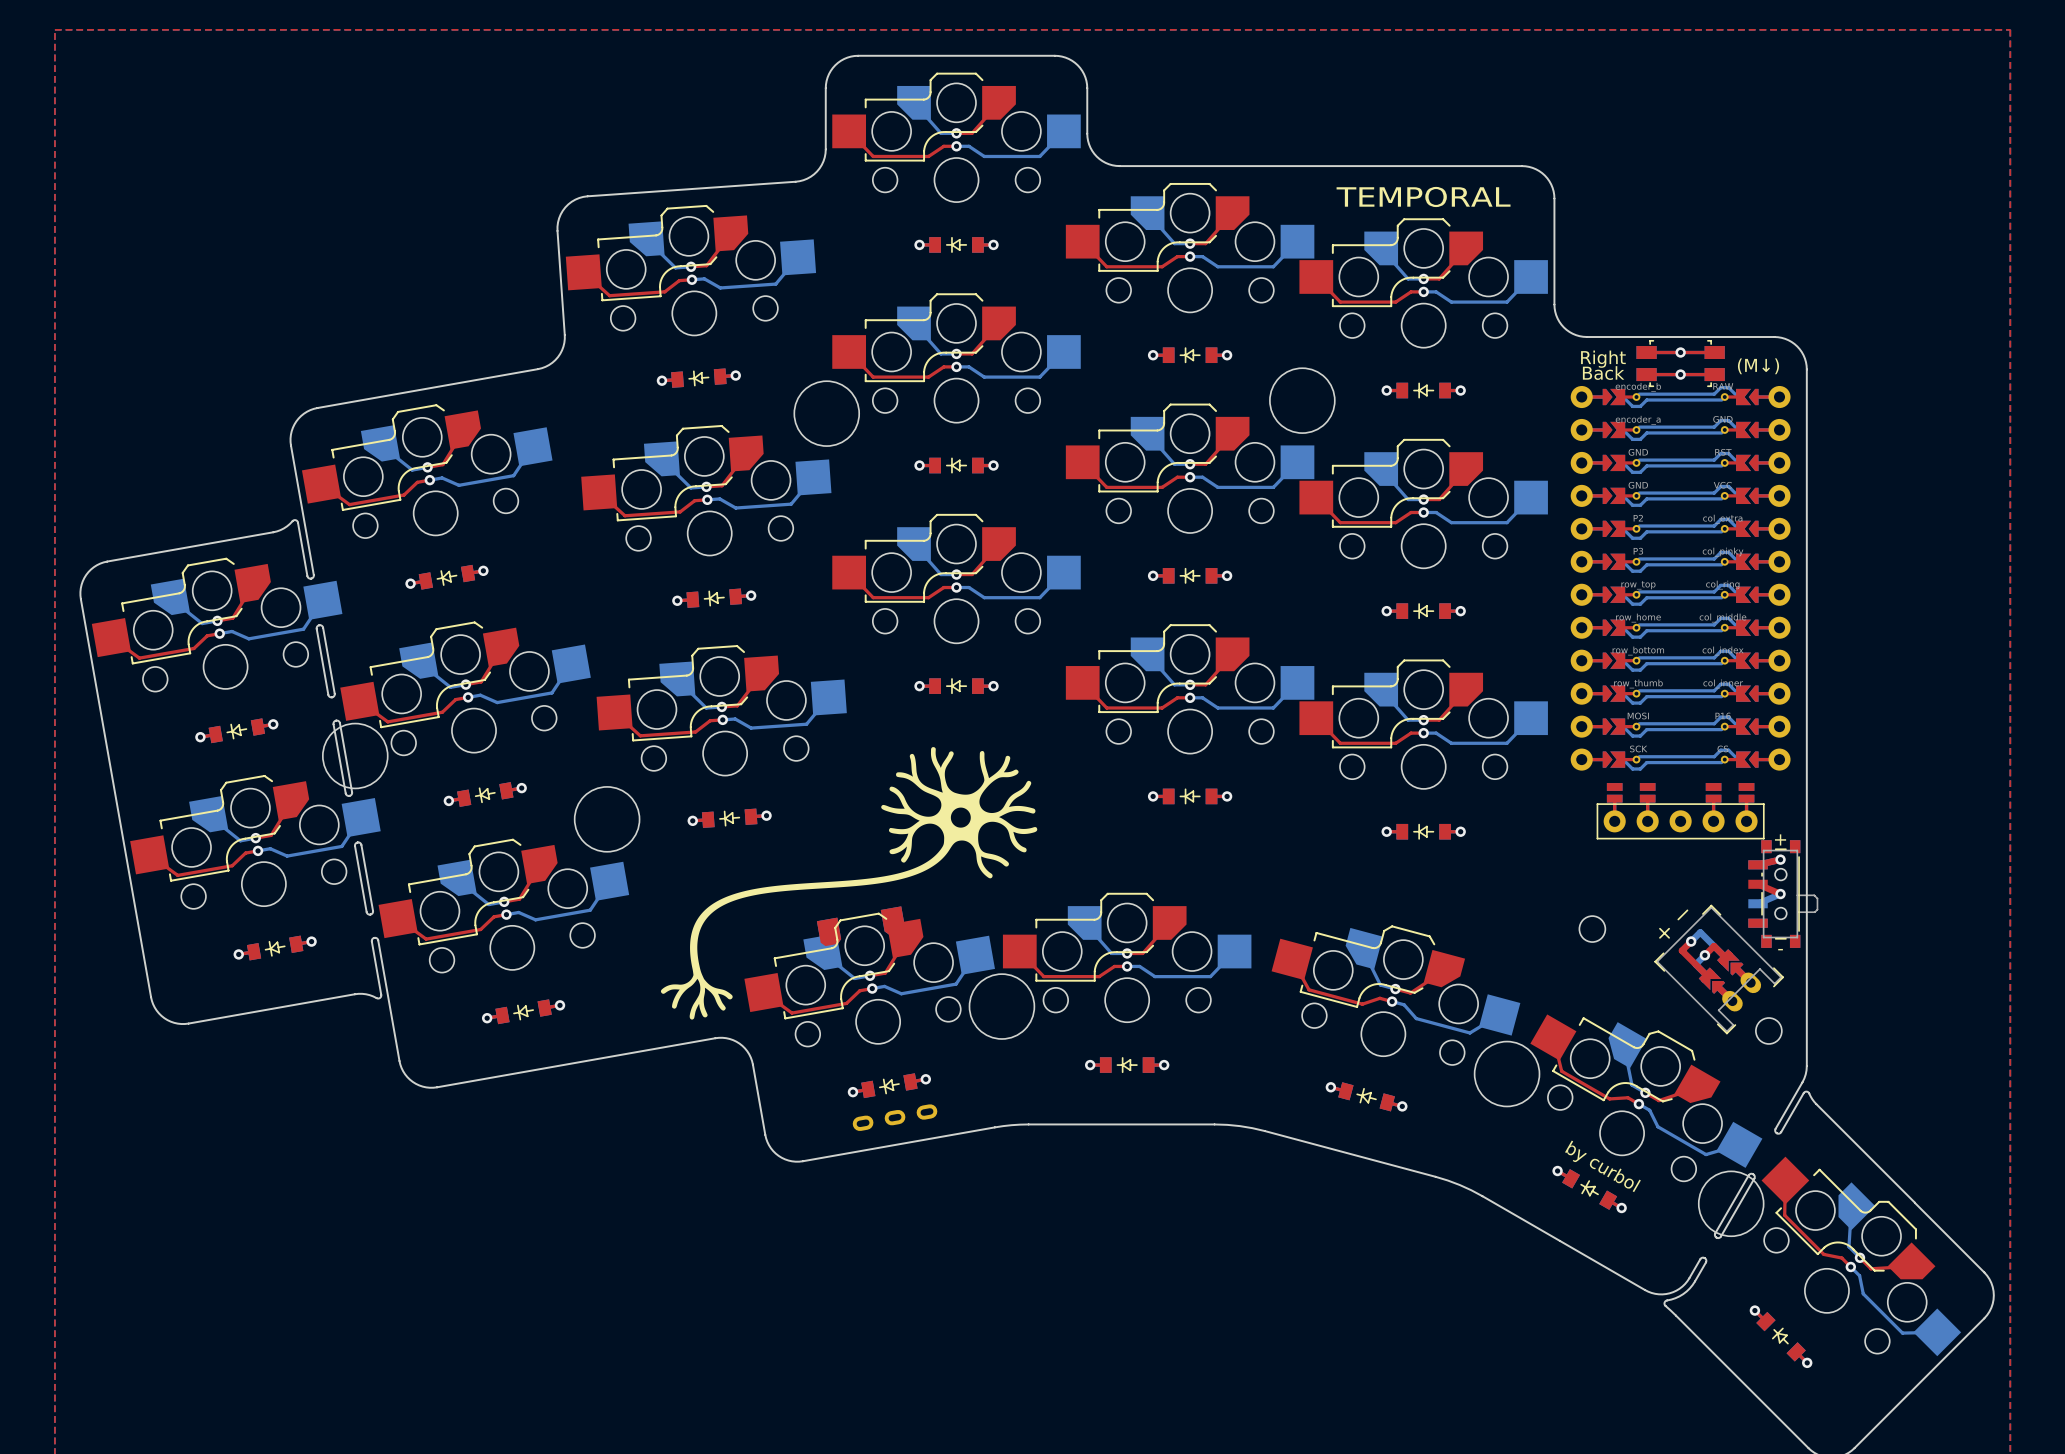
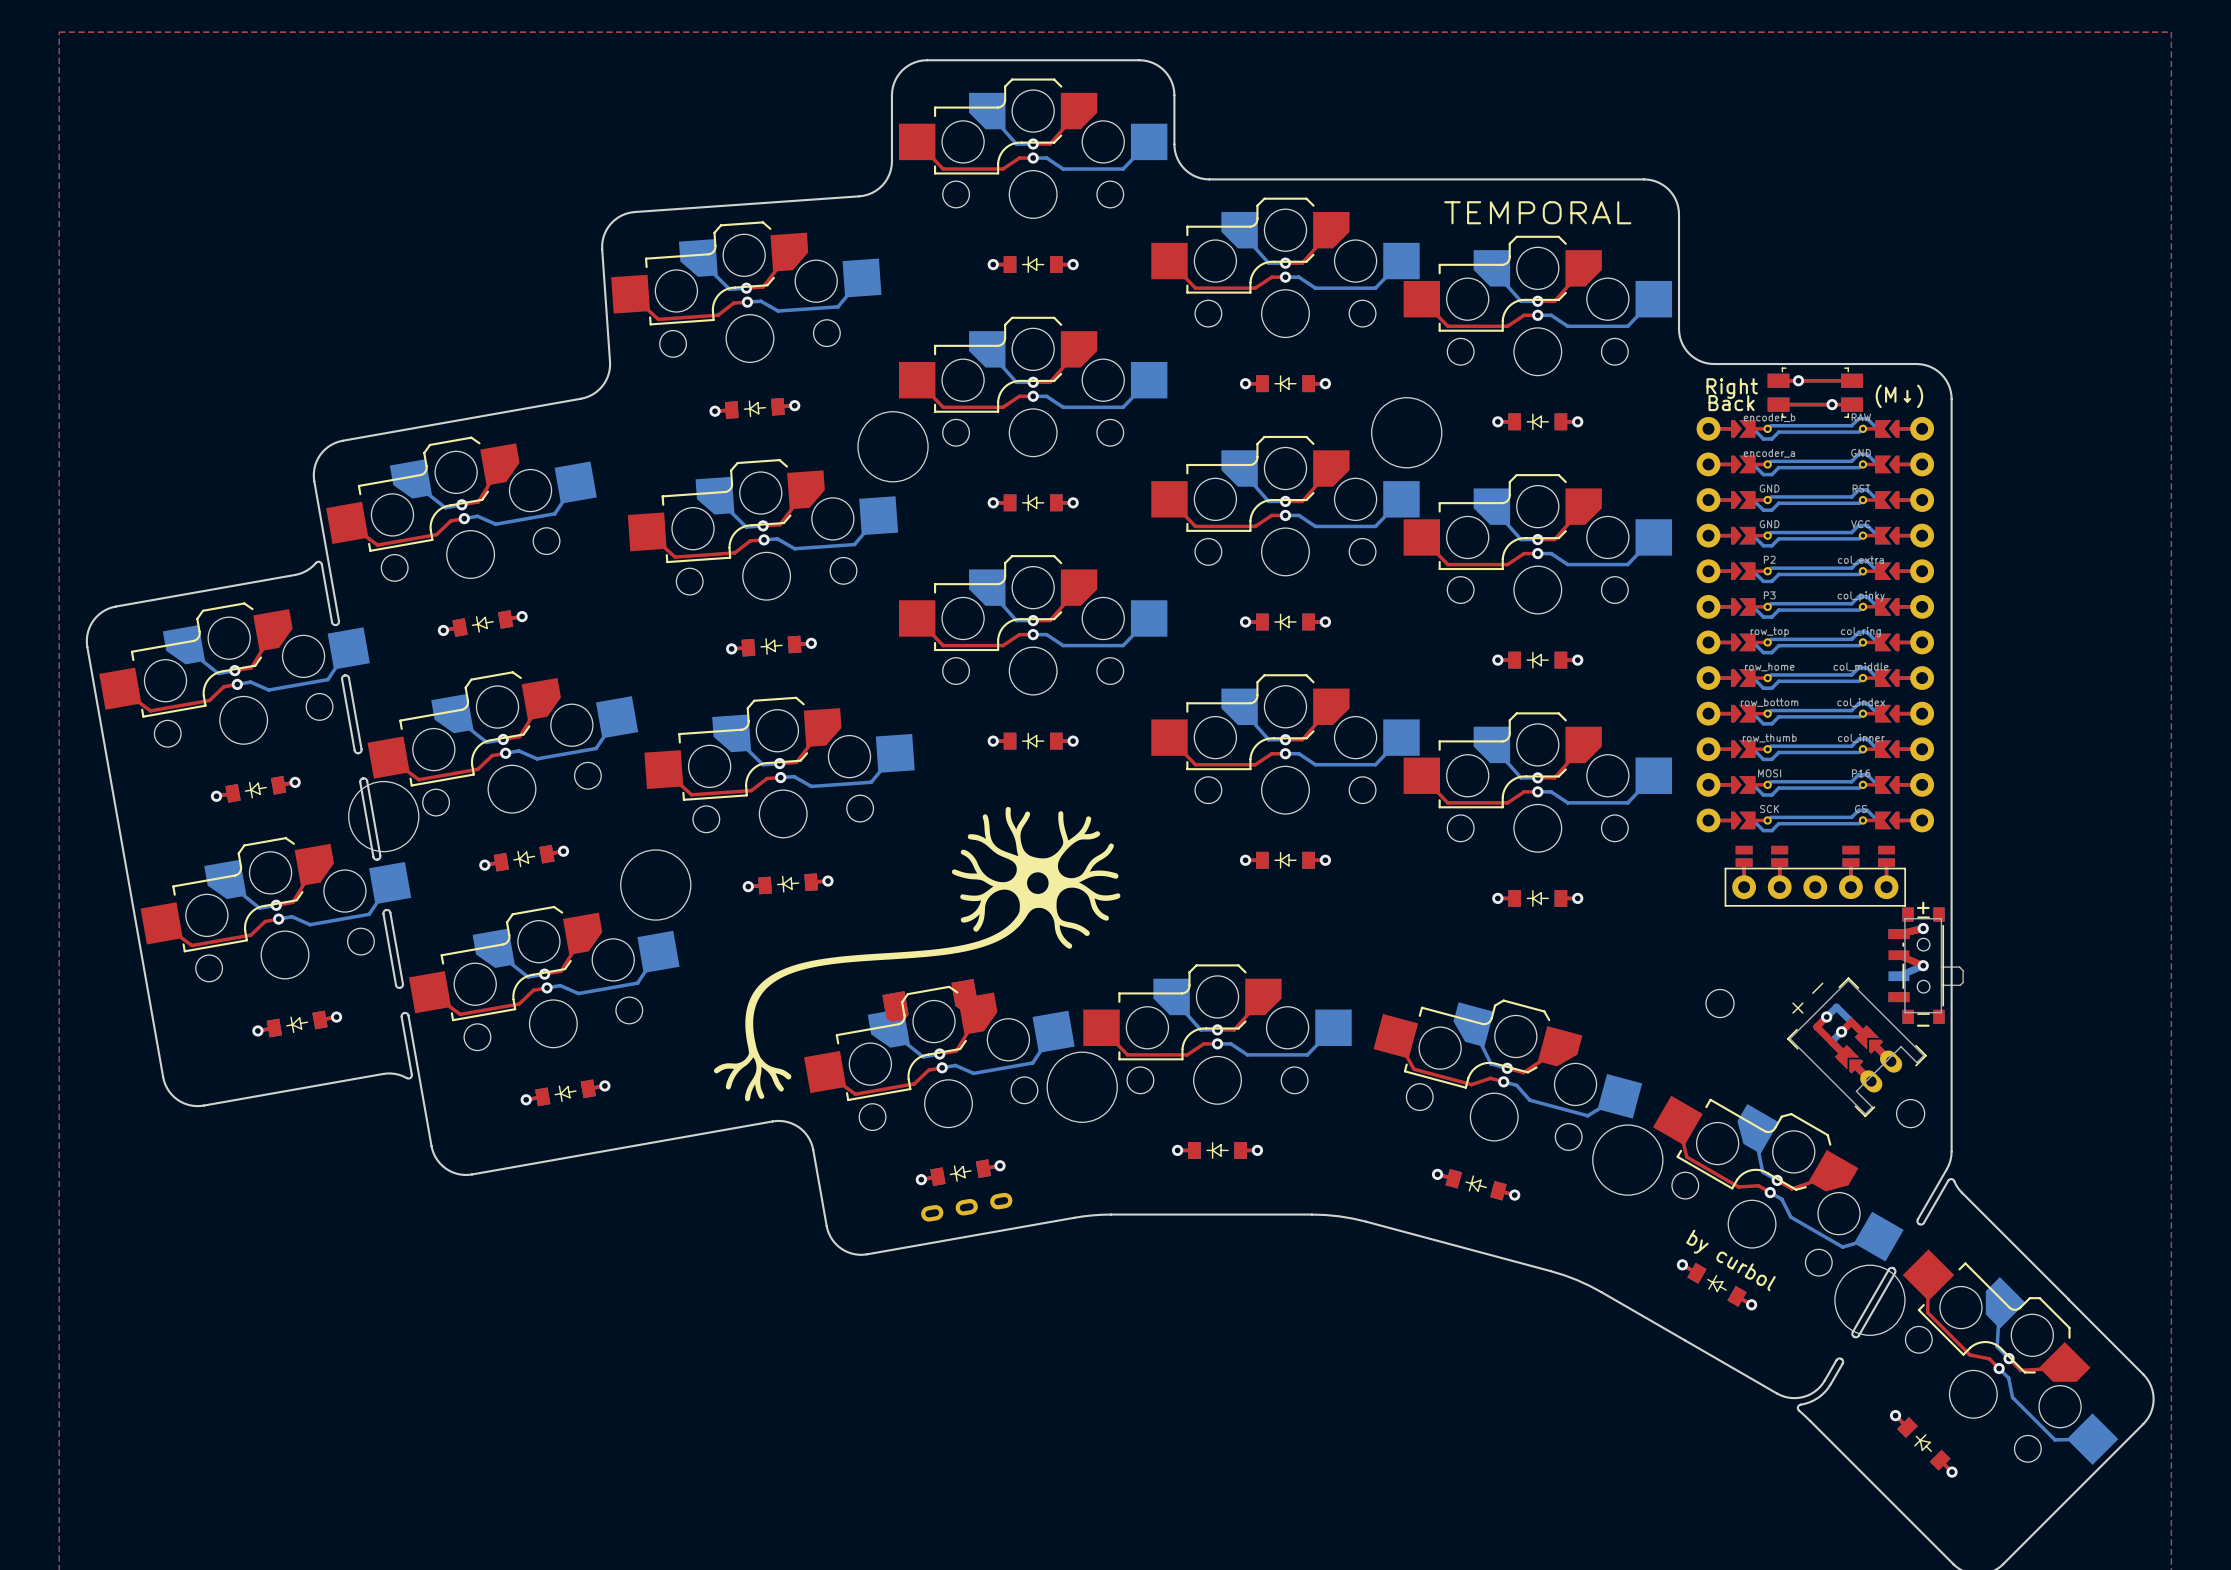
via: none -> (1798, 380)
via: (1680, 352) -> none
via: (1680, 374) -> none
via: none -> (1832, 404)

